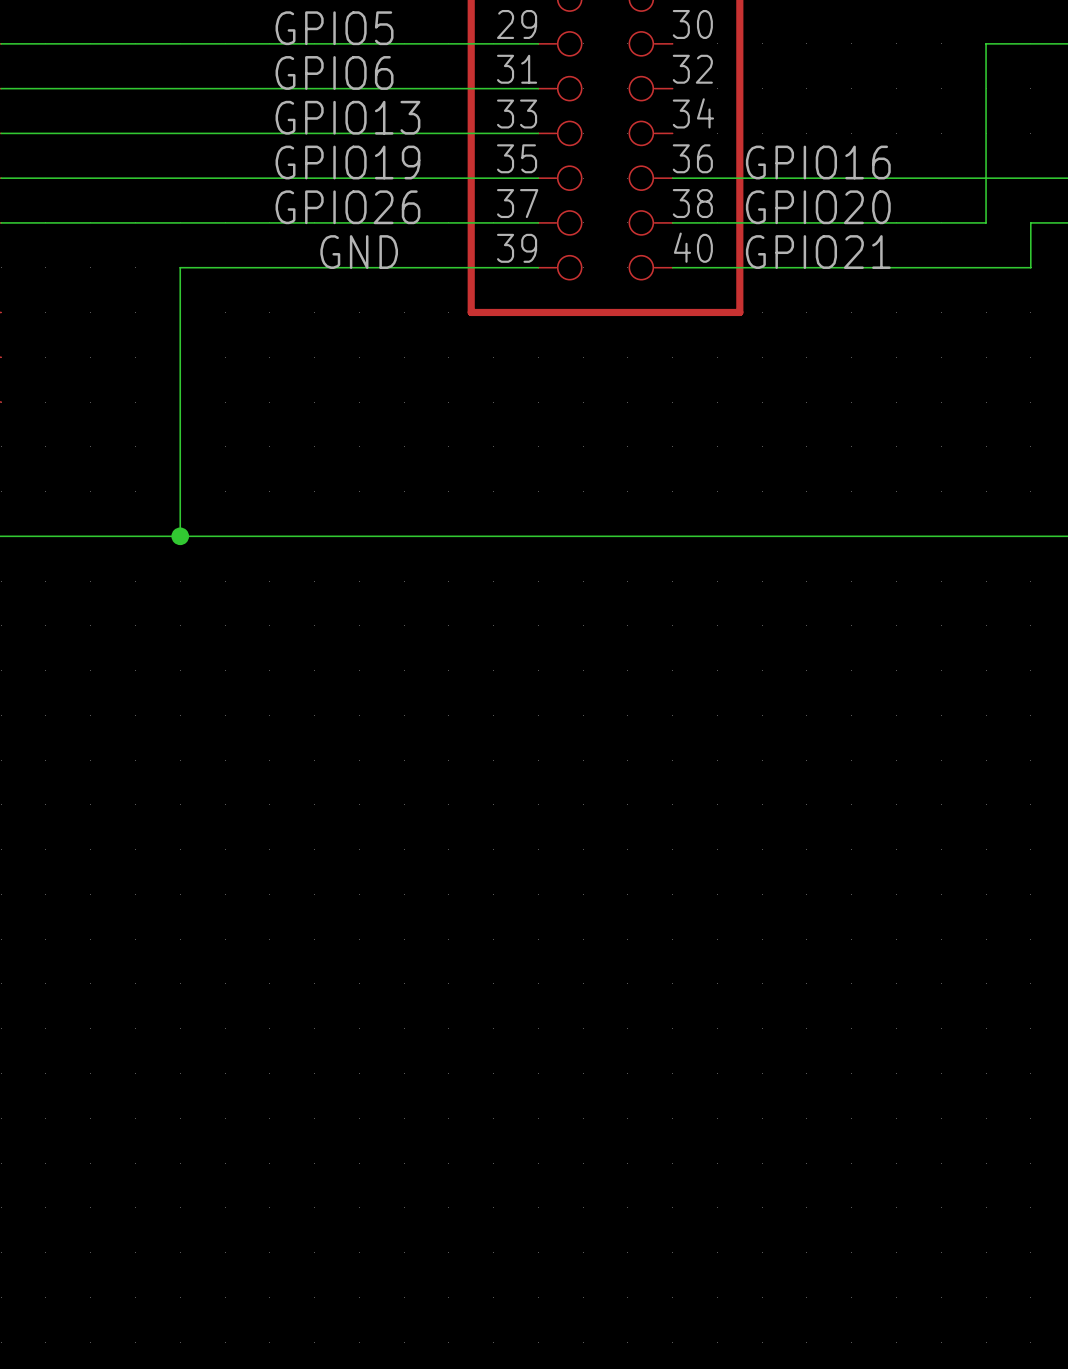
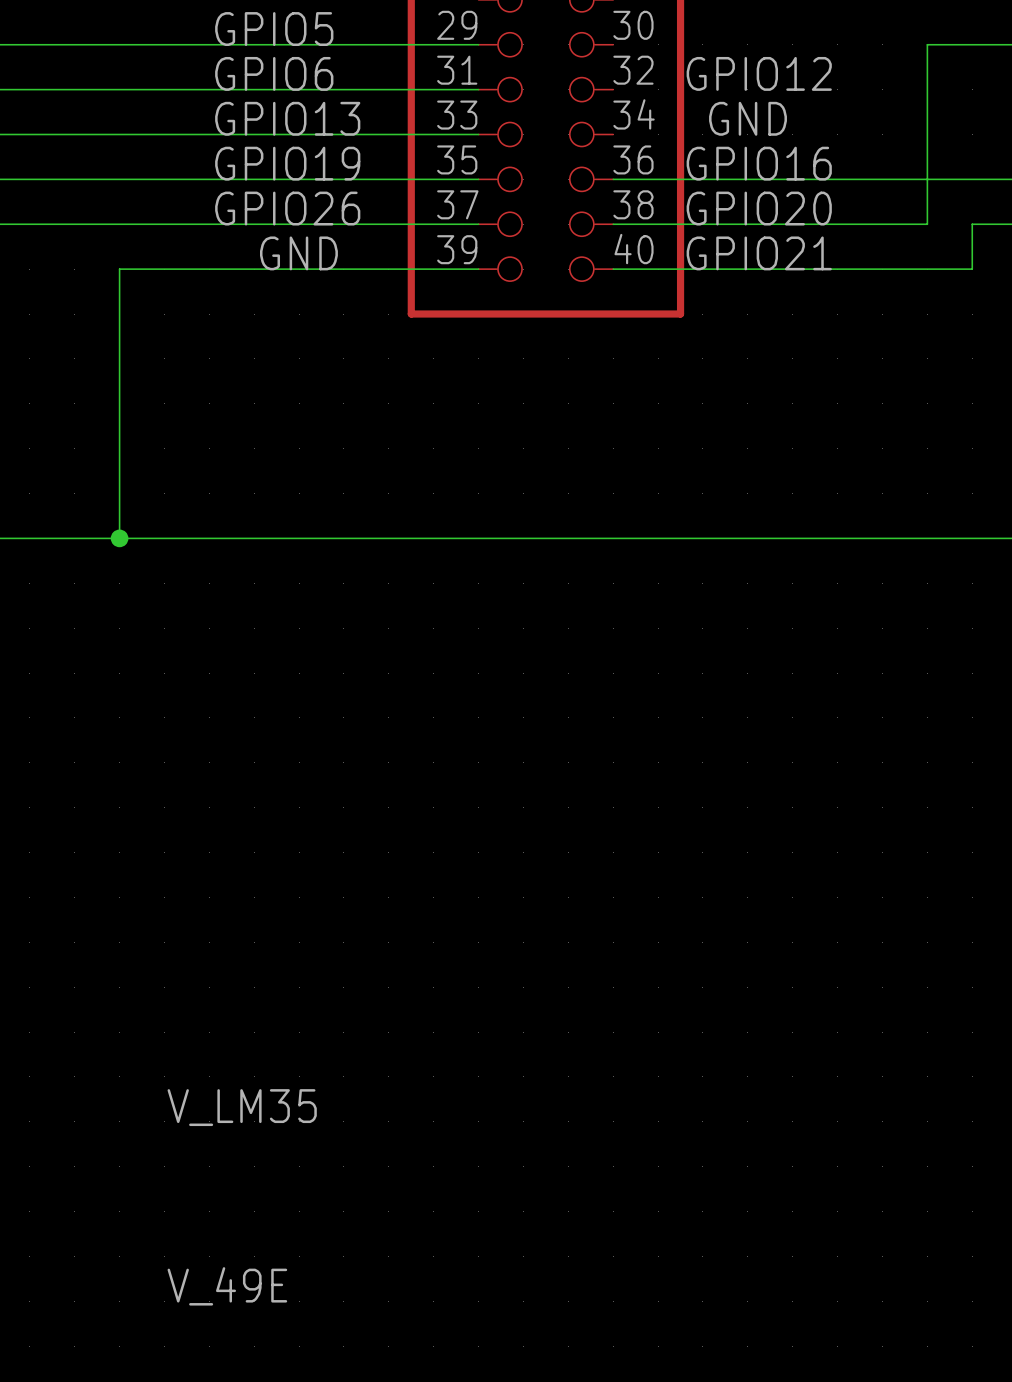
label: none -> GPIO12 (759, 73)
label: none -> GND (748, 118)
label: none -> V_LM35 (242, 1107)
label: none -> V_49E (227, 1286)

